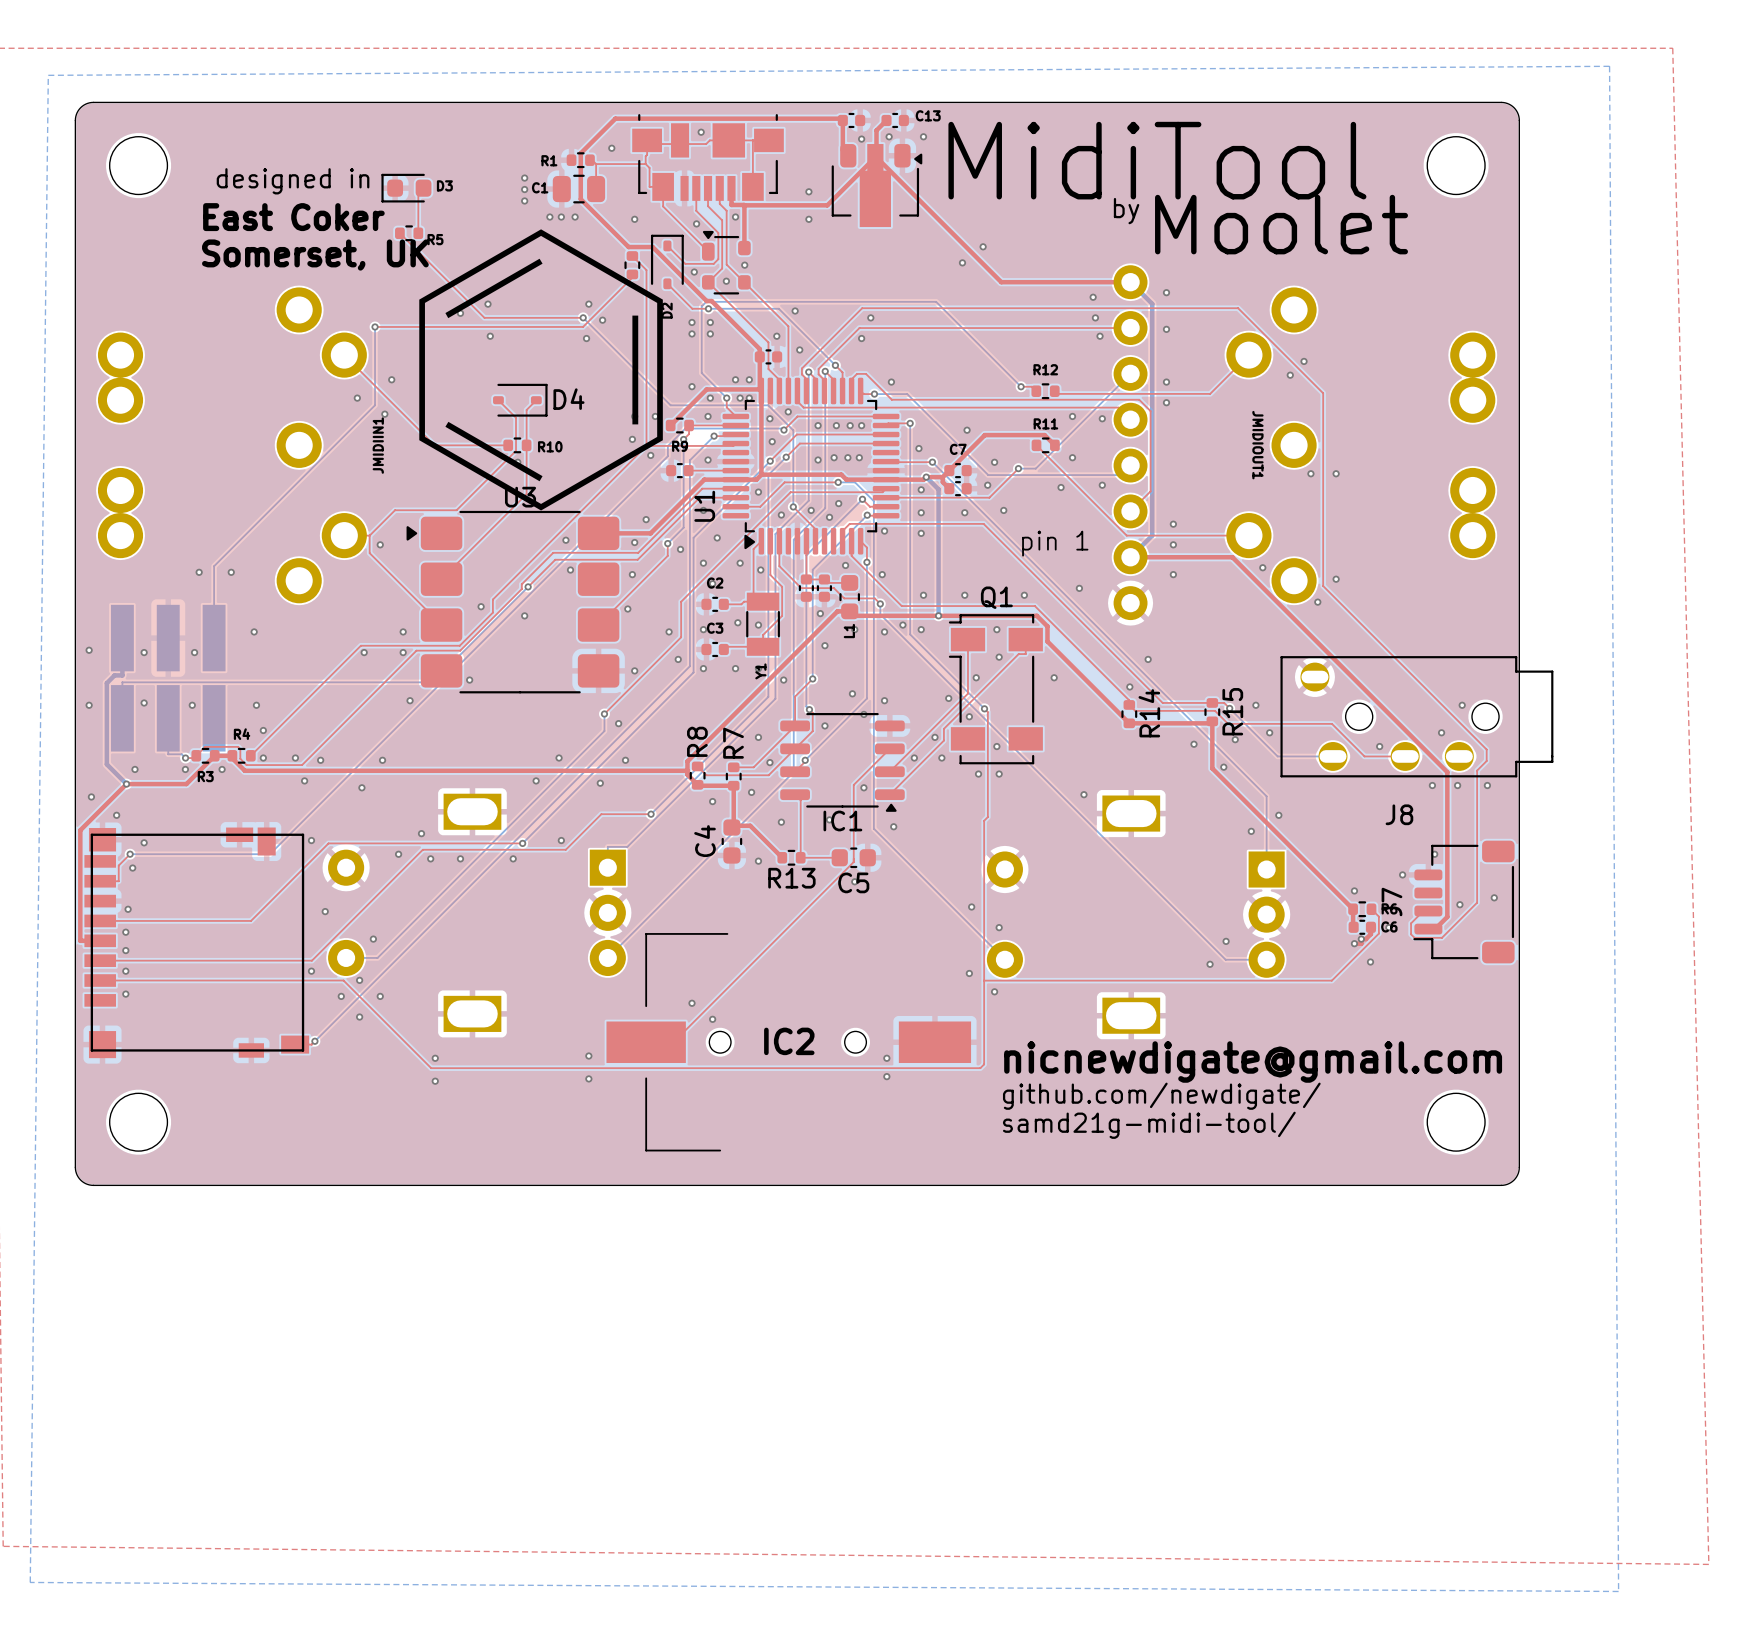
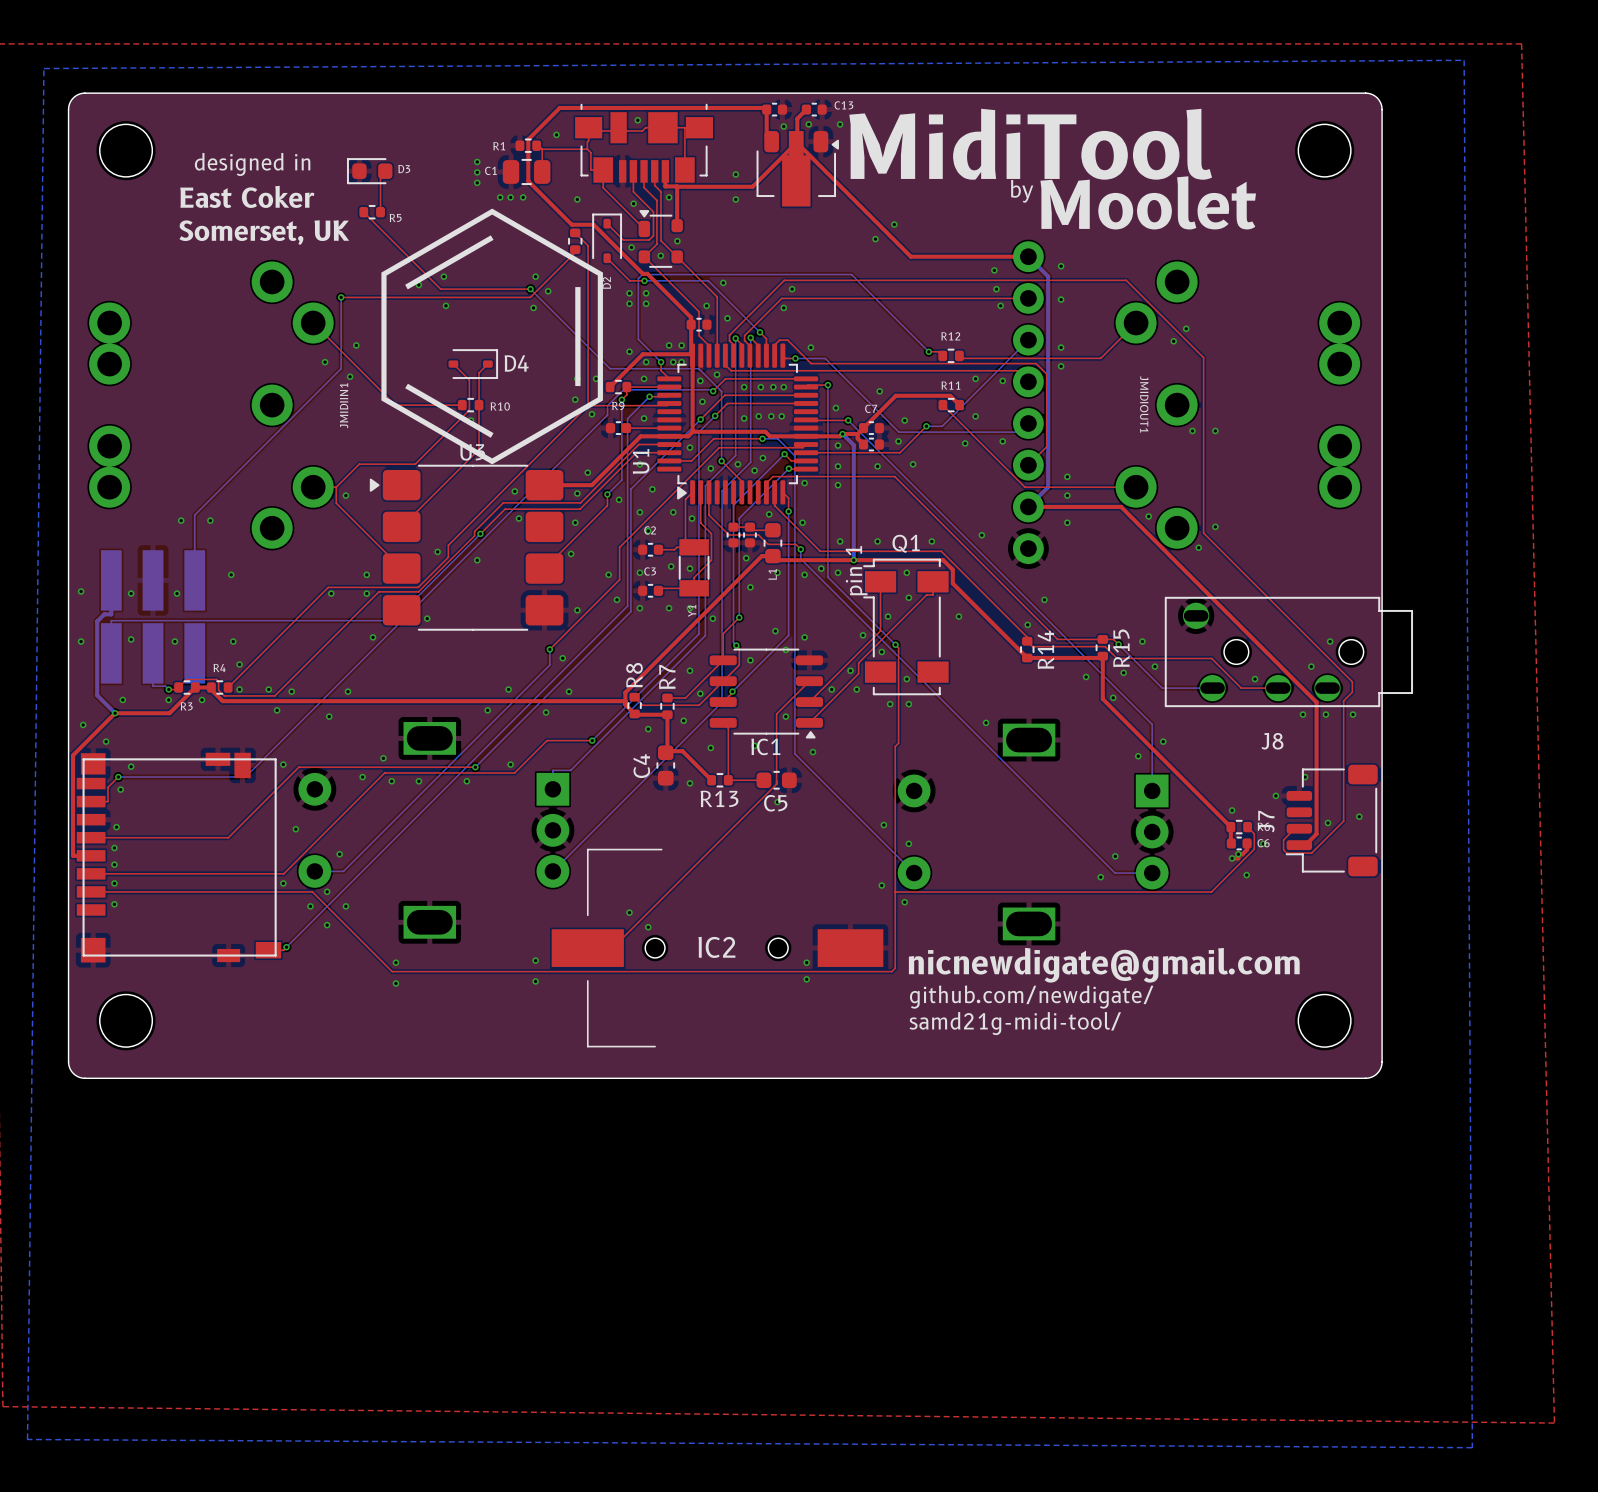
text rotation: 0° (1055, 543) -> 90° counterclockwise (856, 570)
text position: pin 1 (1055, 543) -> pin 1 (856, 570)

